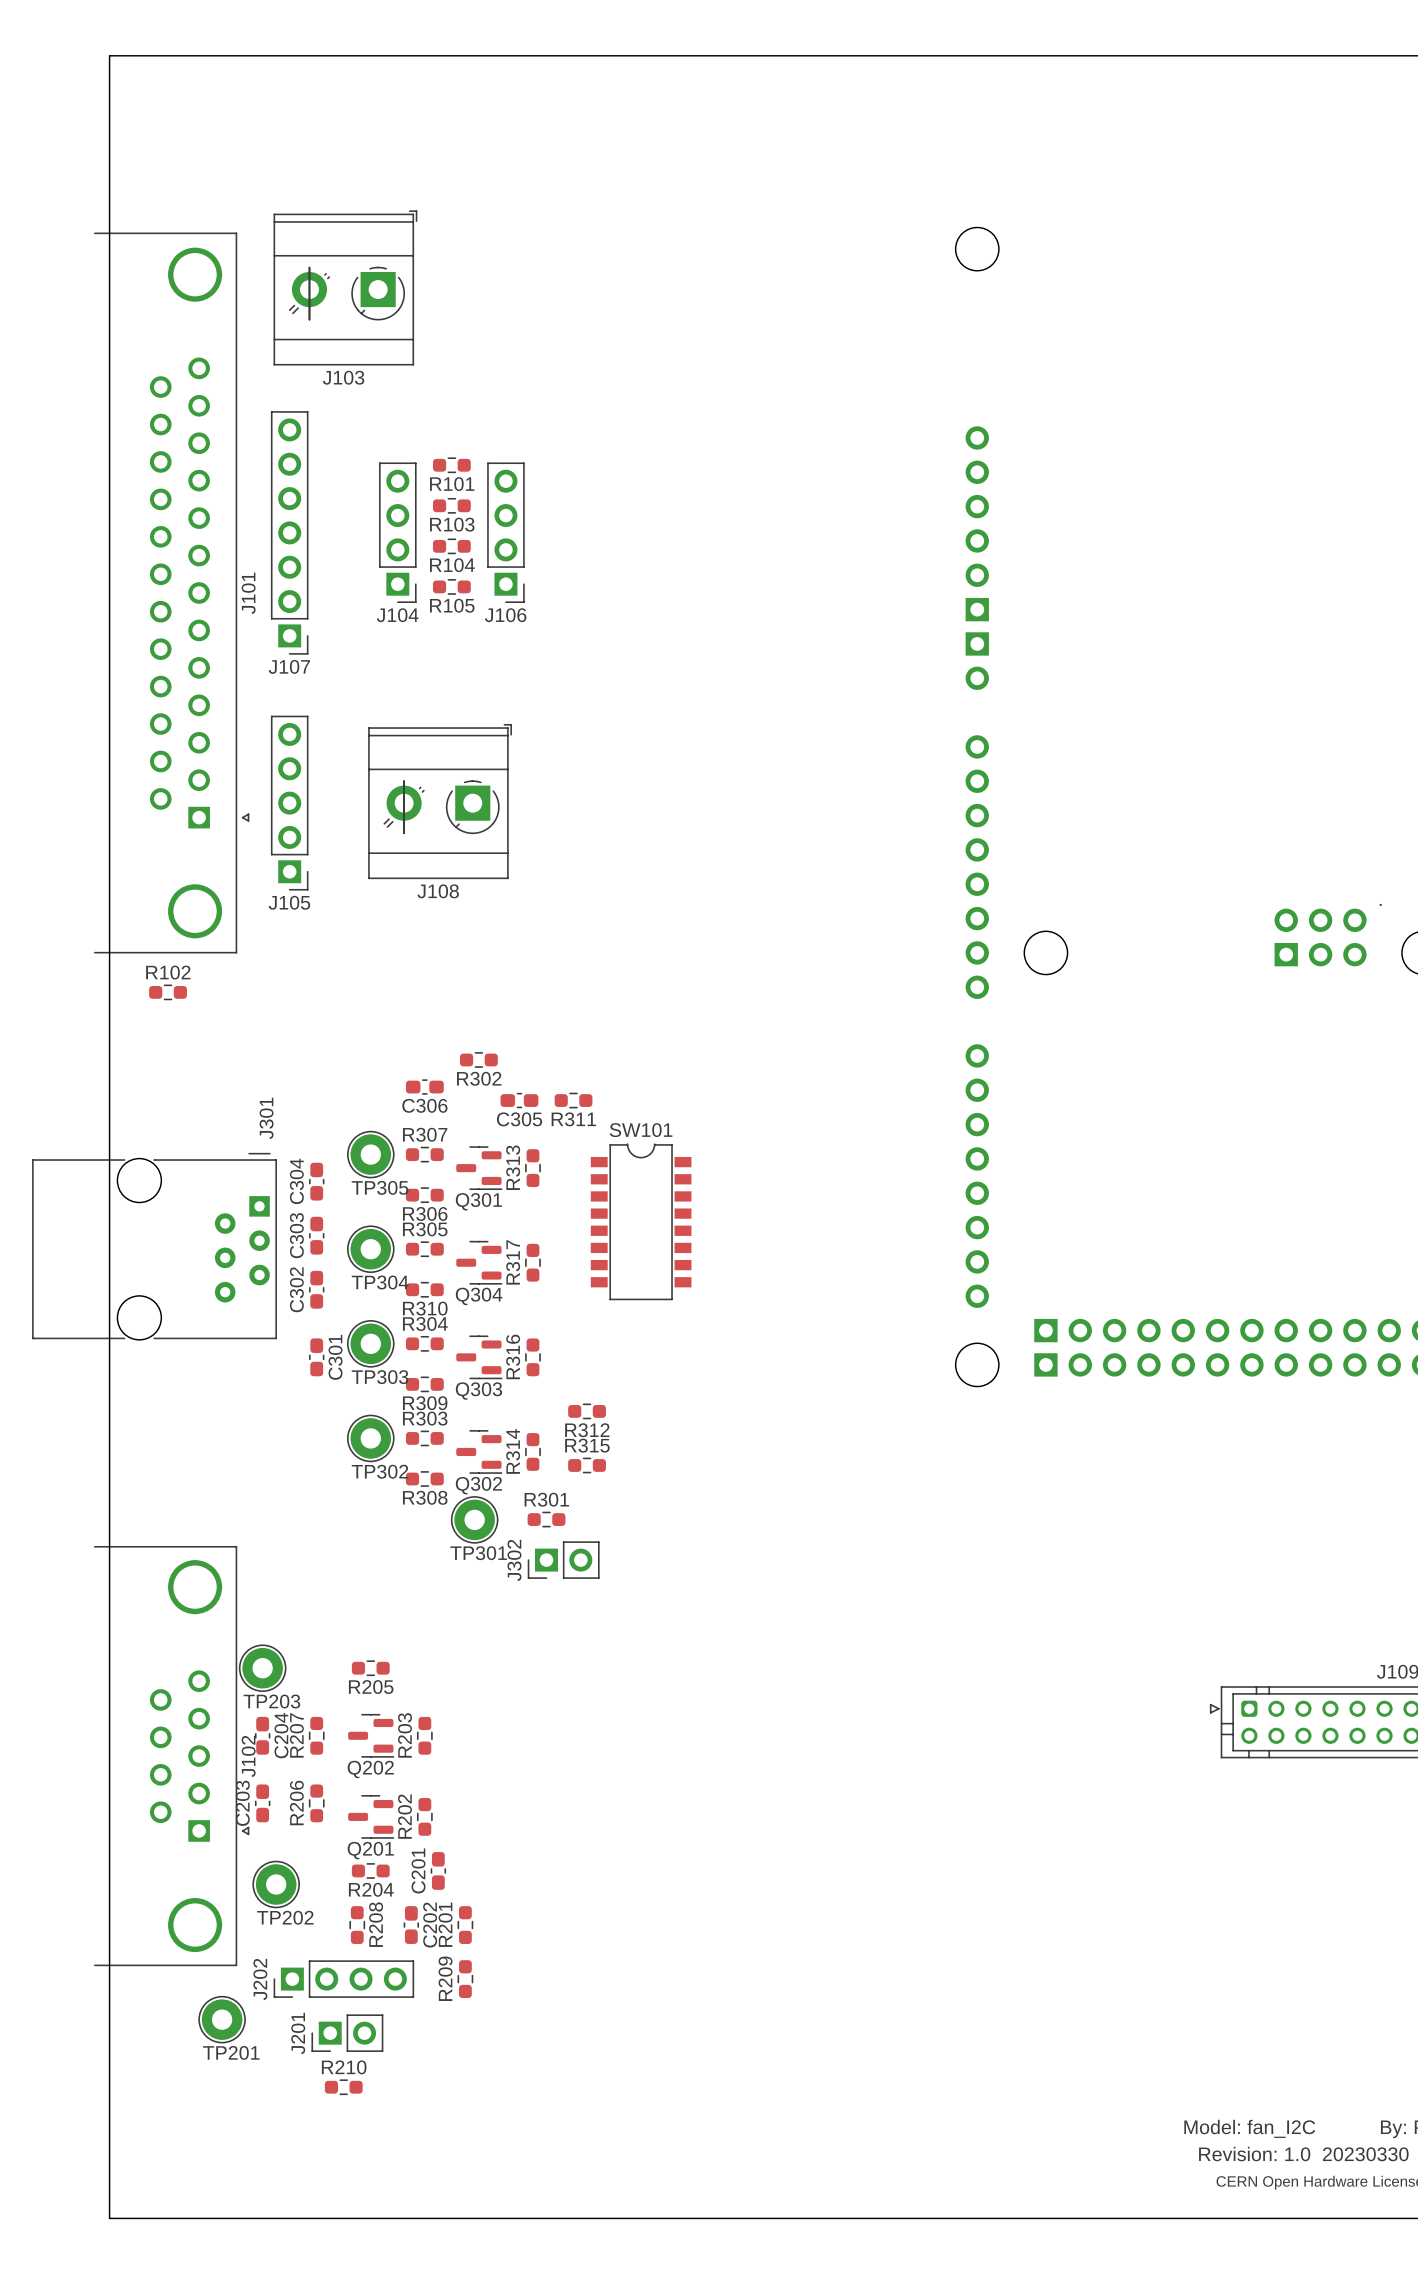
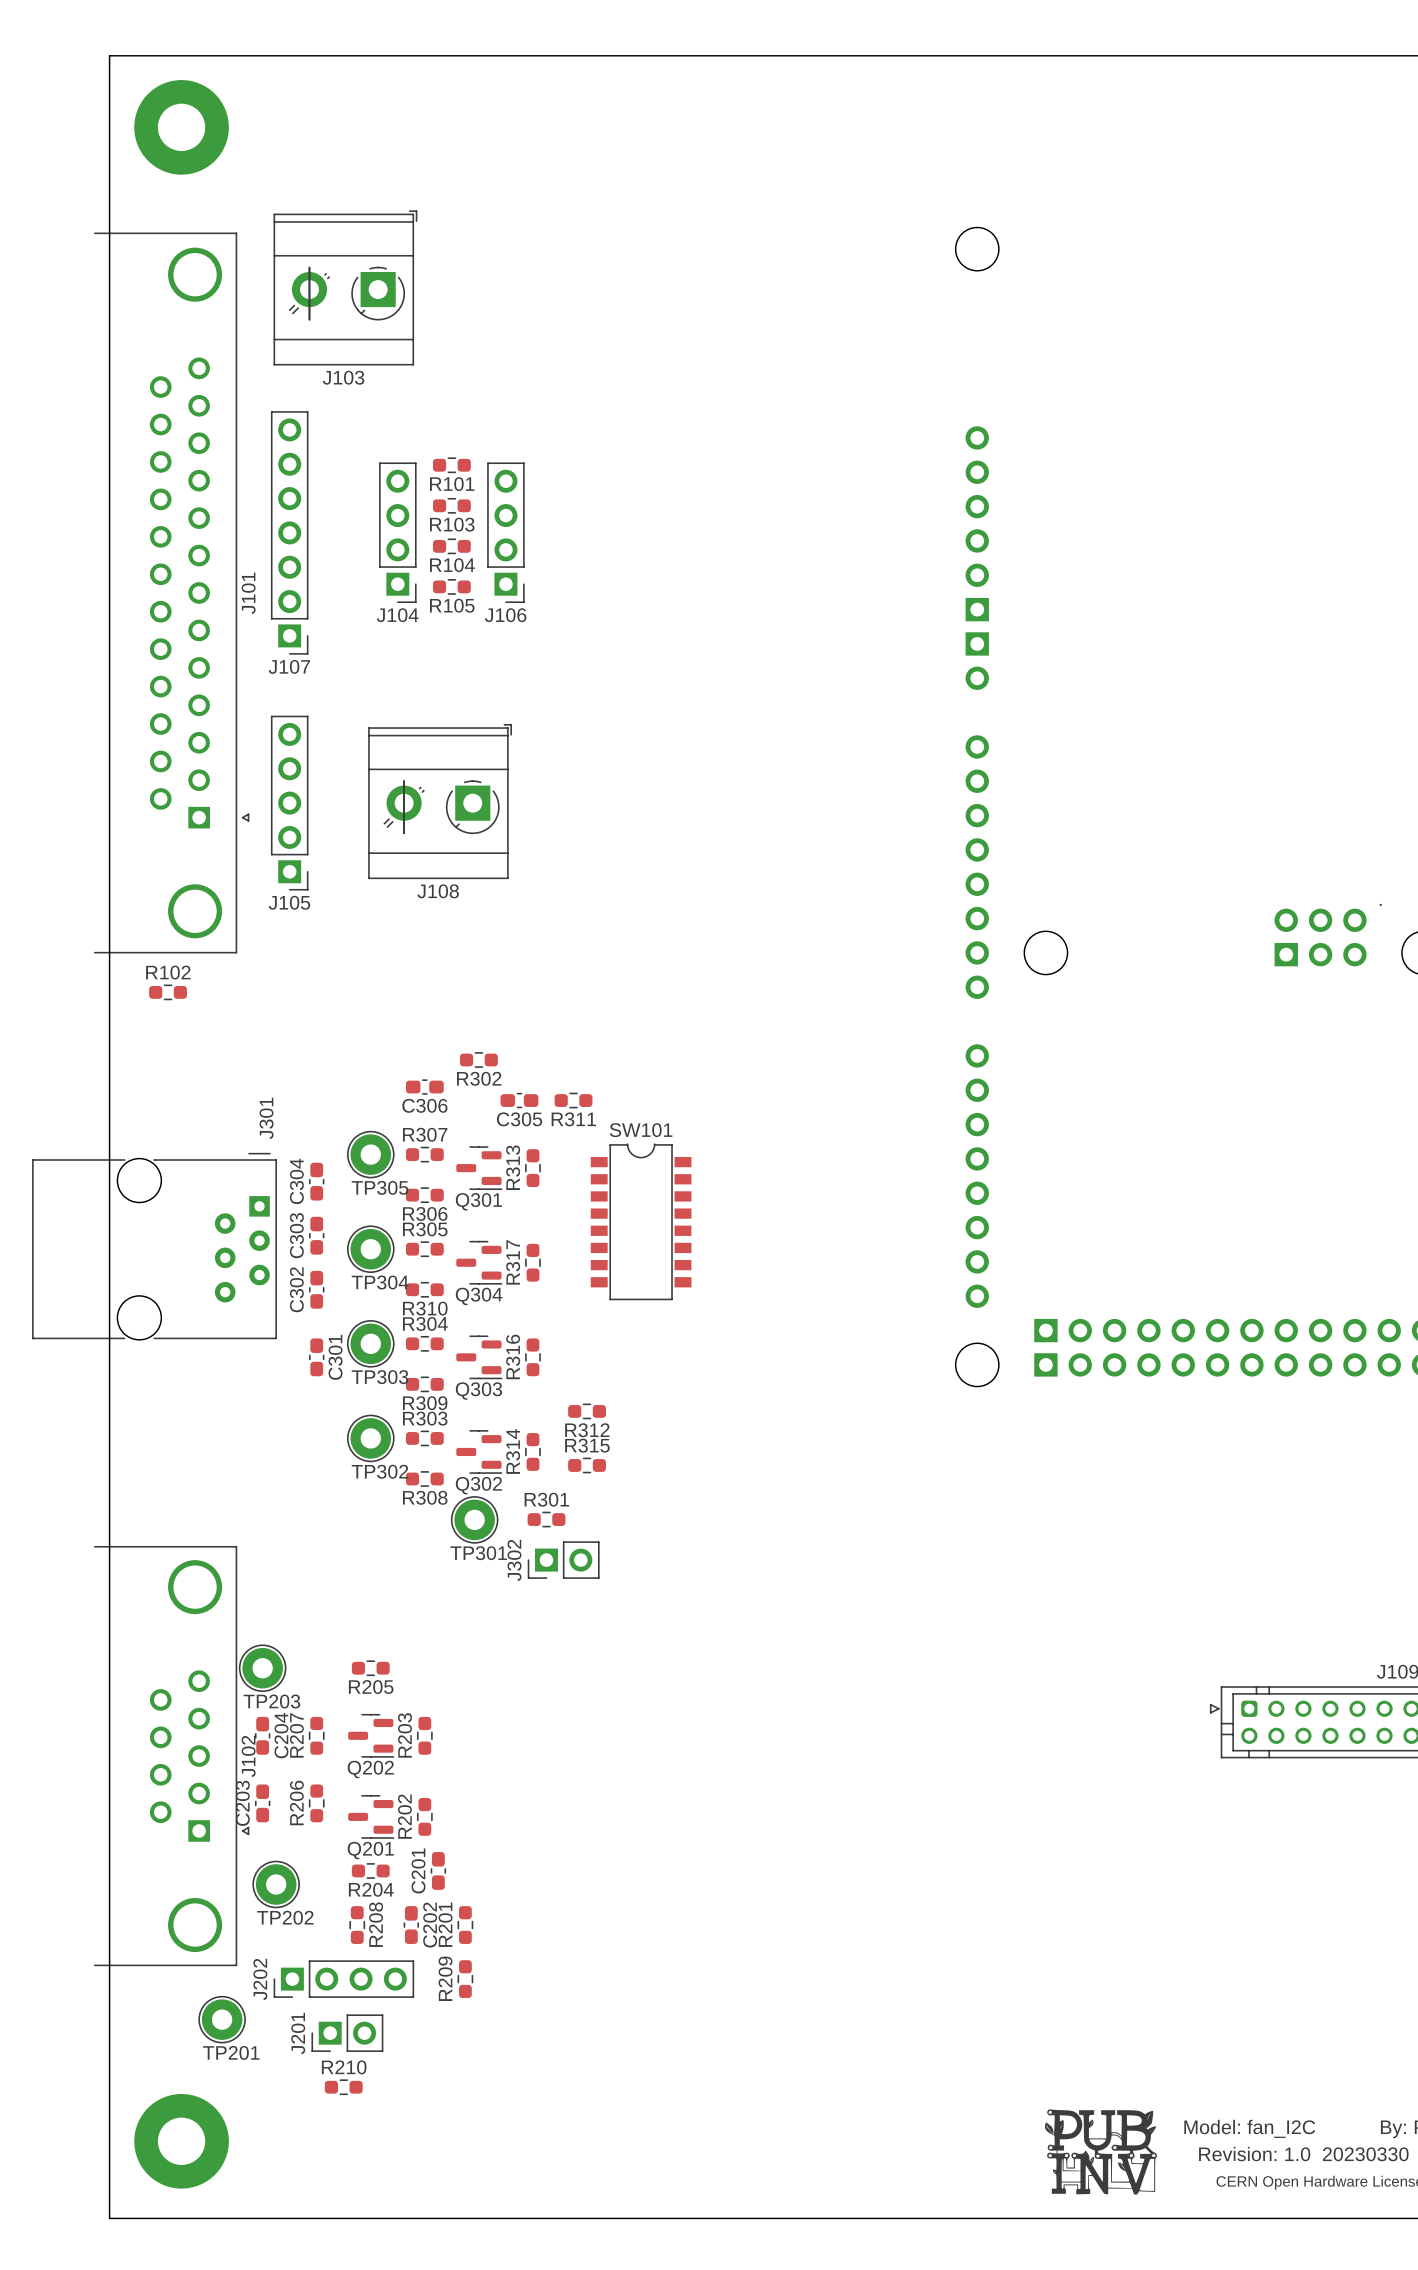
part: none -> (181, 127)
drawing: none -> [1044, 2109, 1158, 2195]
part: none -> (181, 2141)

